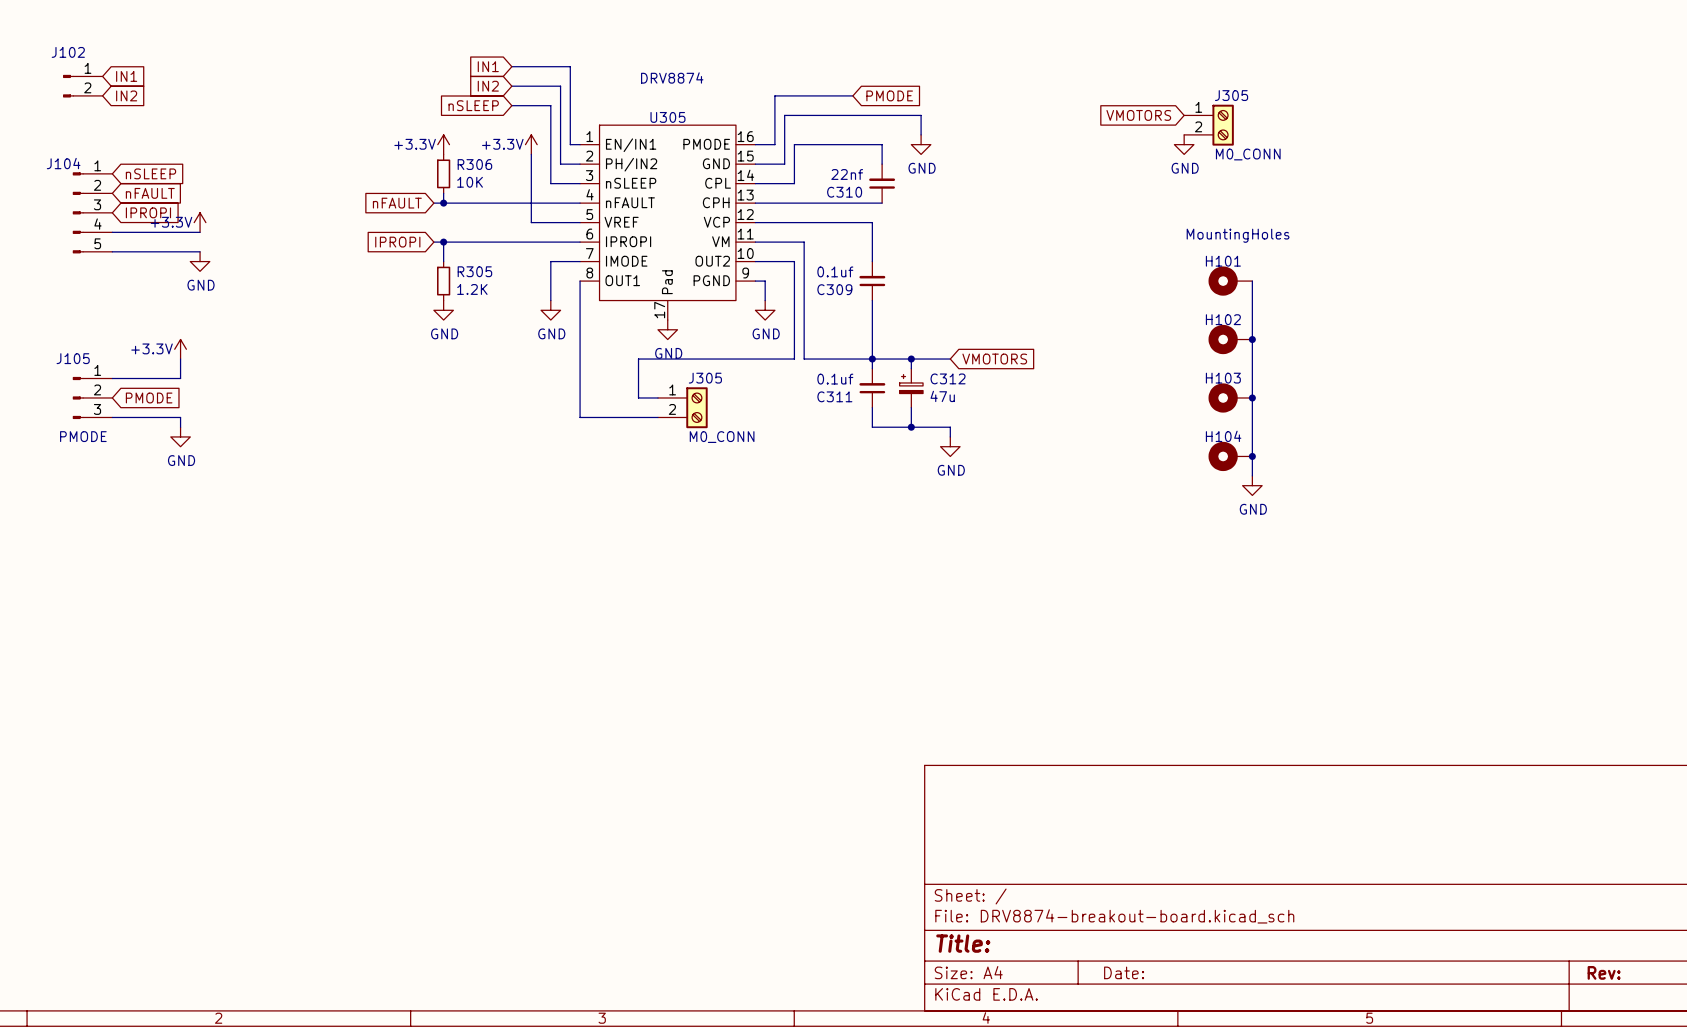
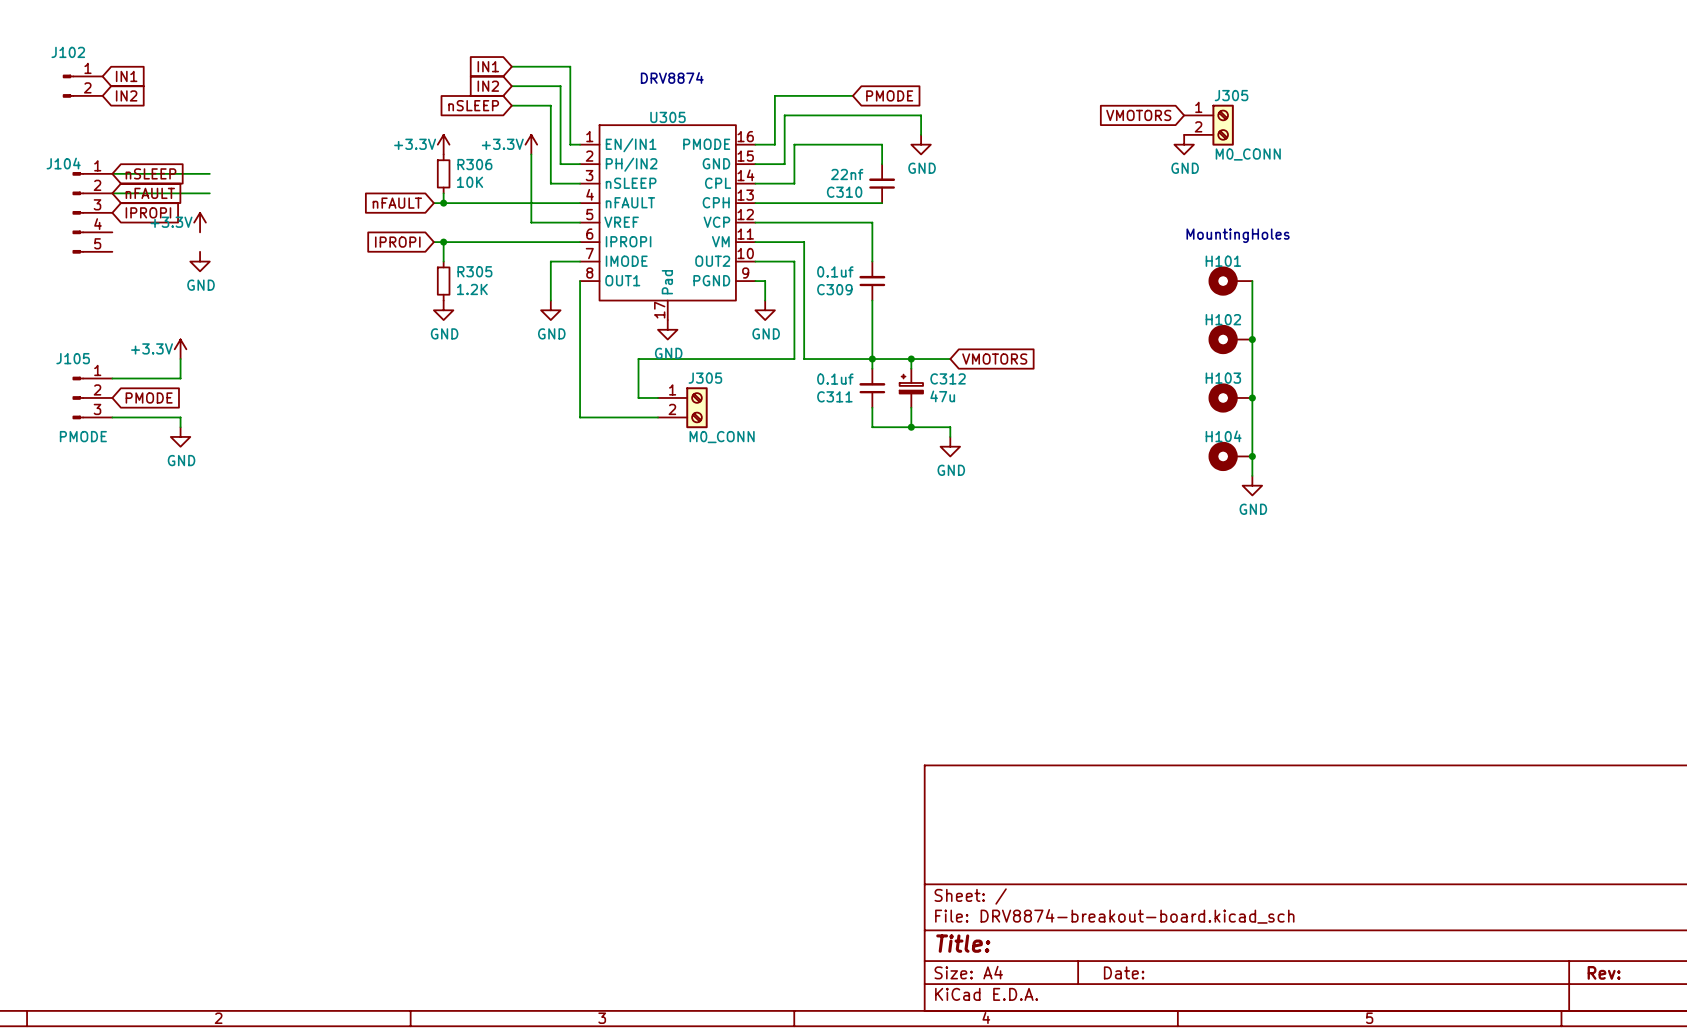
wire: none -> (112, 173) (209, 173)
wire: none -> (112, 193) (209, 193)
wire: (112, 232) (200, 232) -> none
wire: (112, 251) (200, 251) -> none

